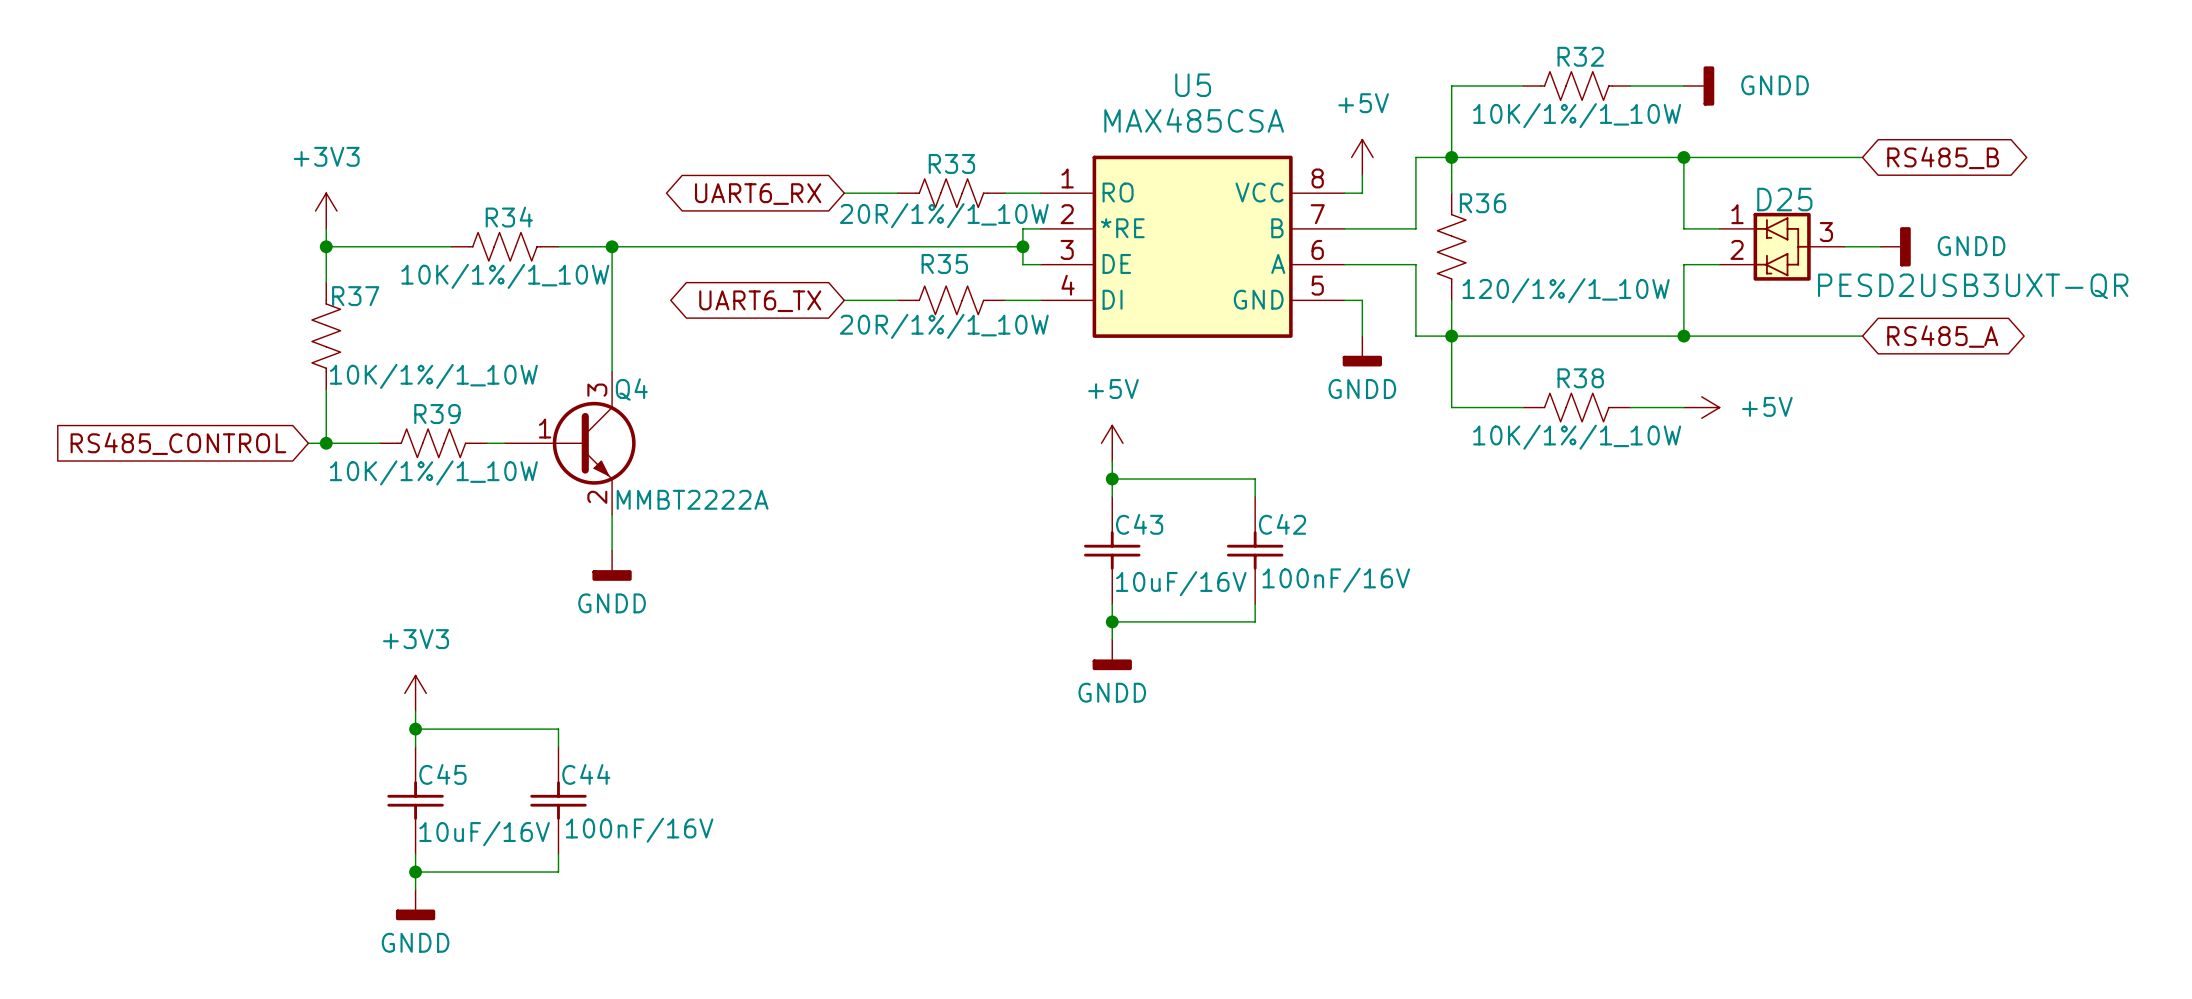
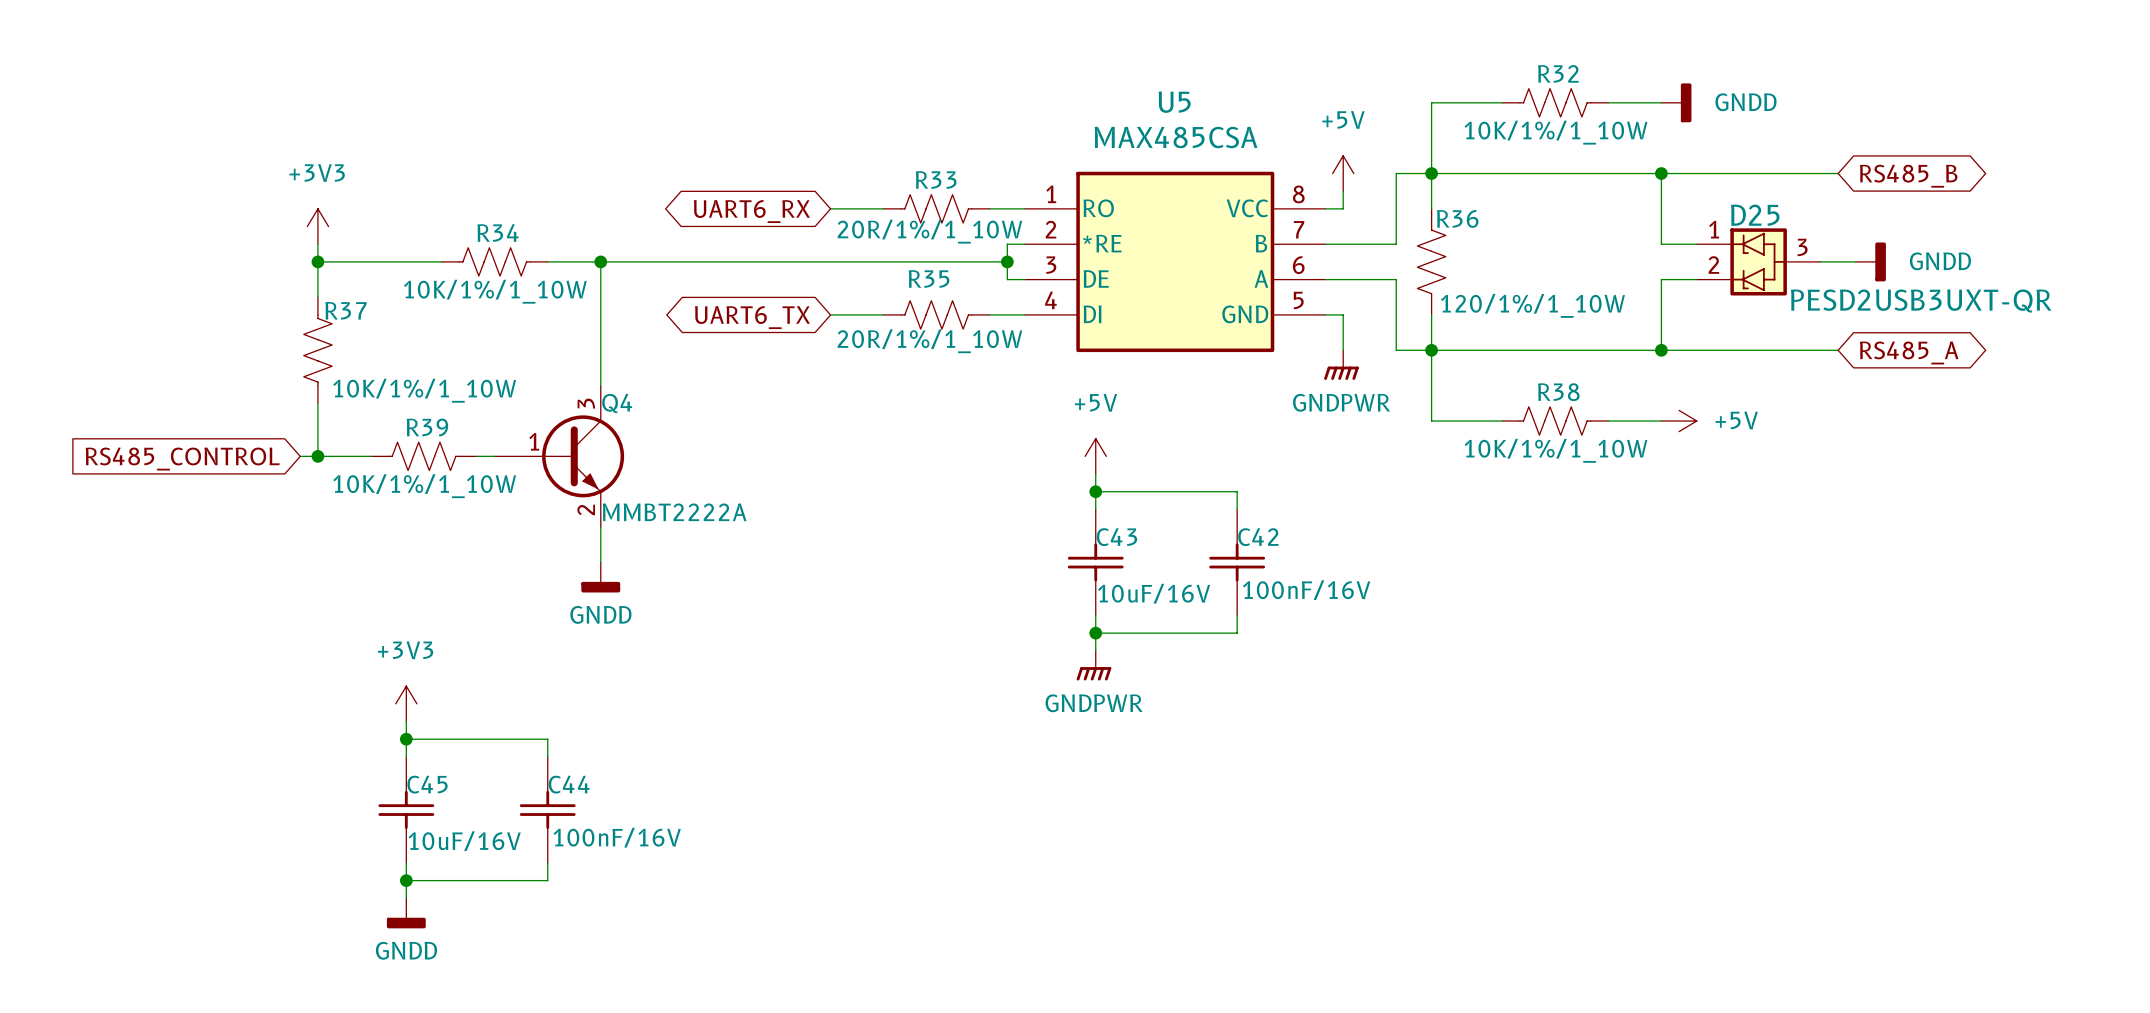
power symbol: GNDD (1362, 351) -> GNDPWR (1341, 365)
power symbol: GNDD (1112, 654) -> GNDPWR (1093, 665)

